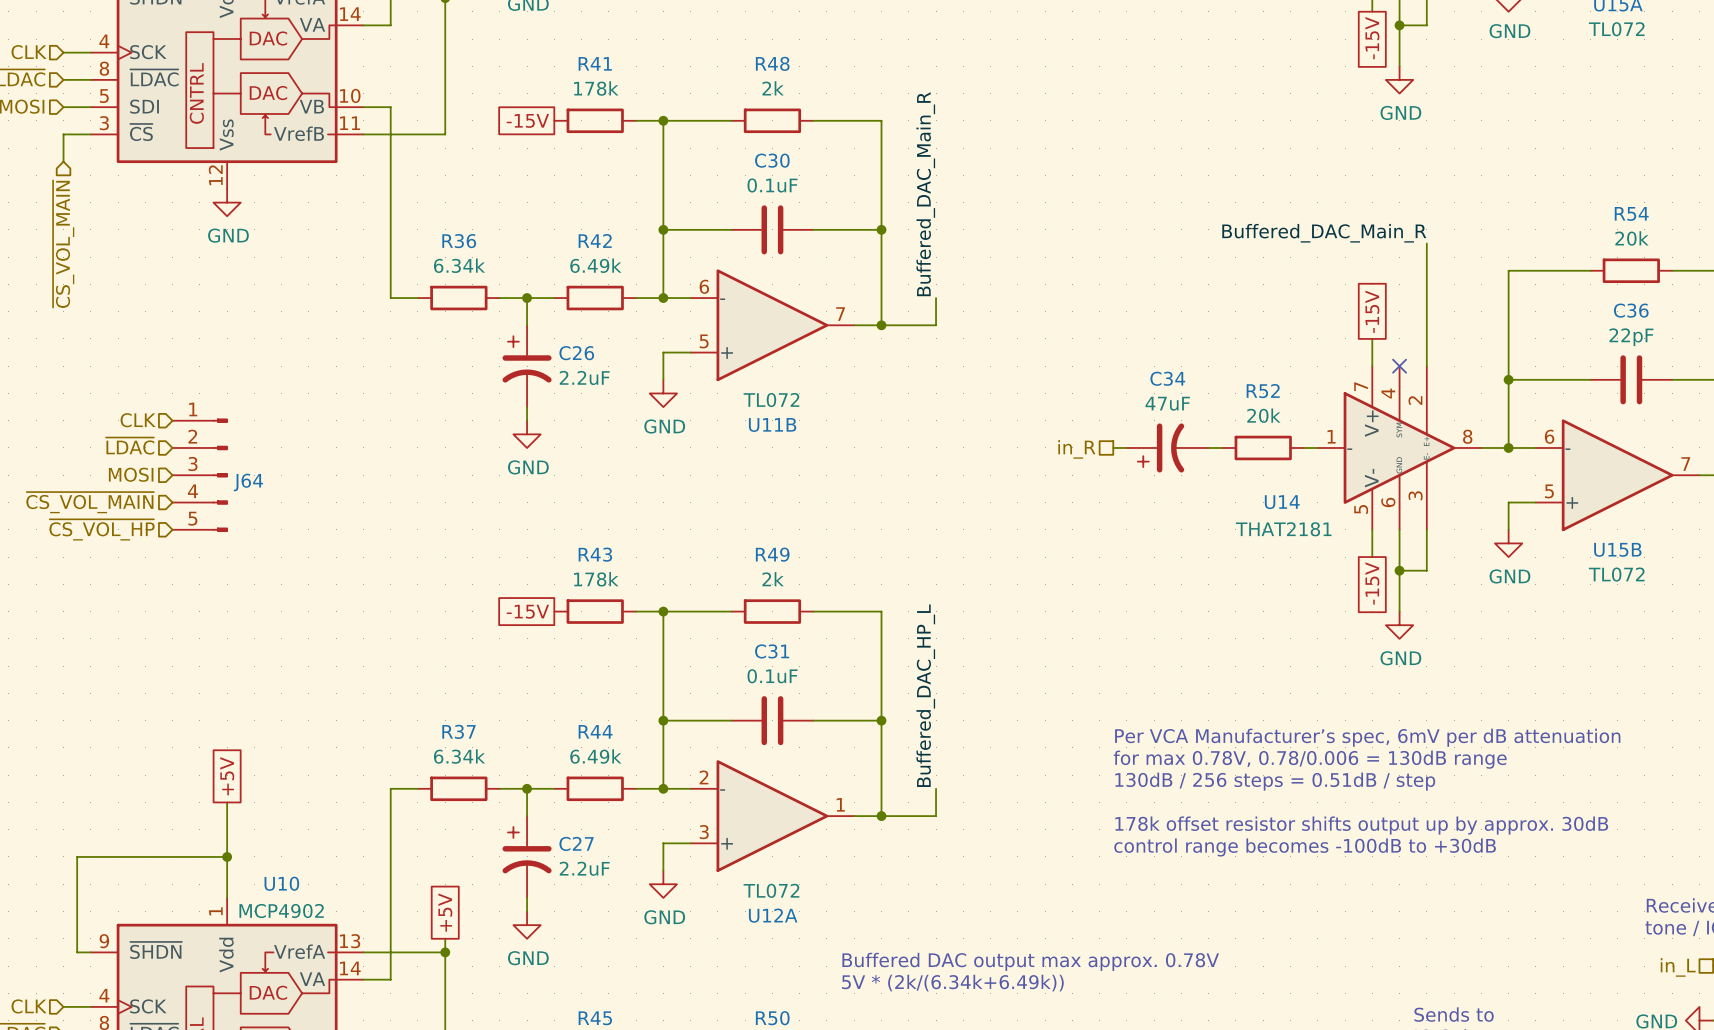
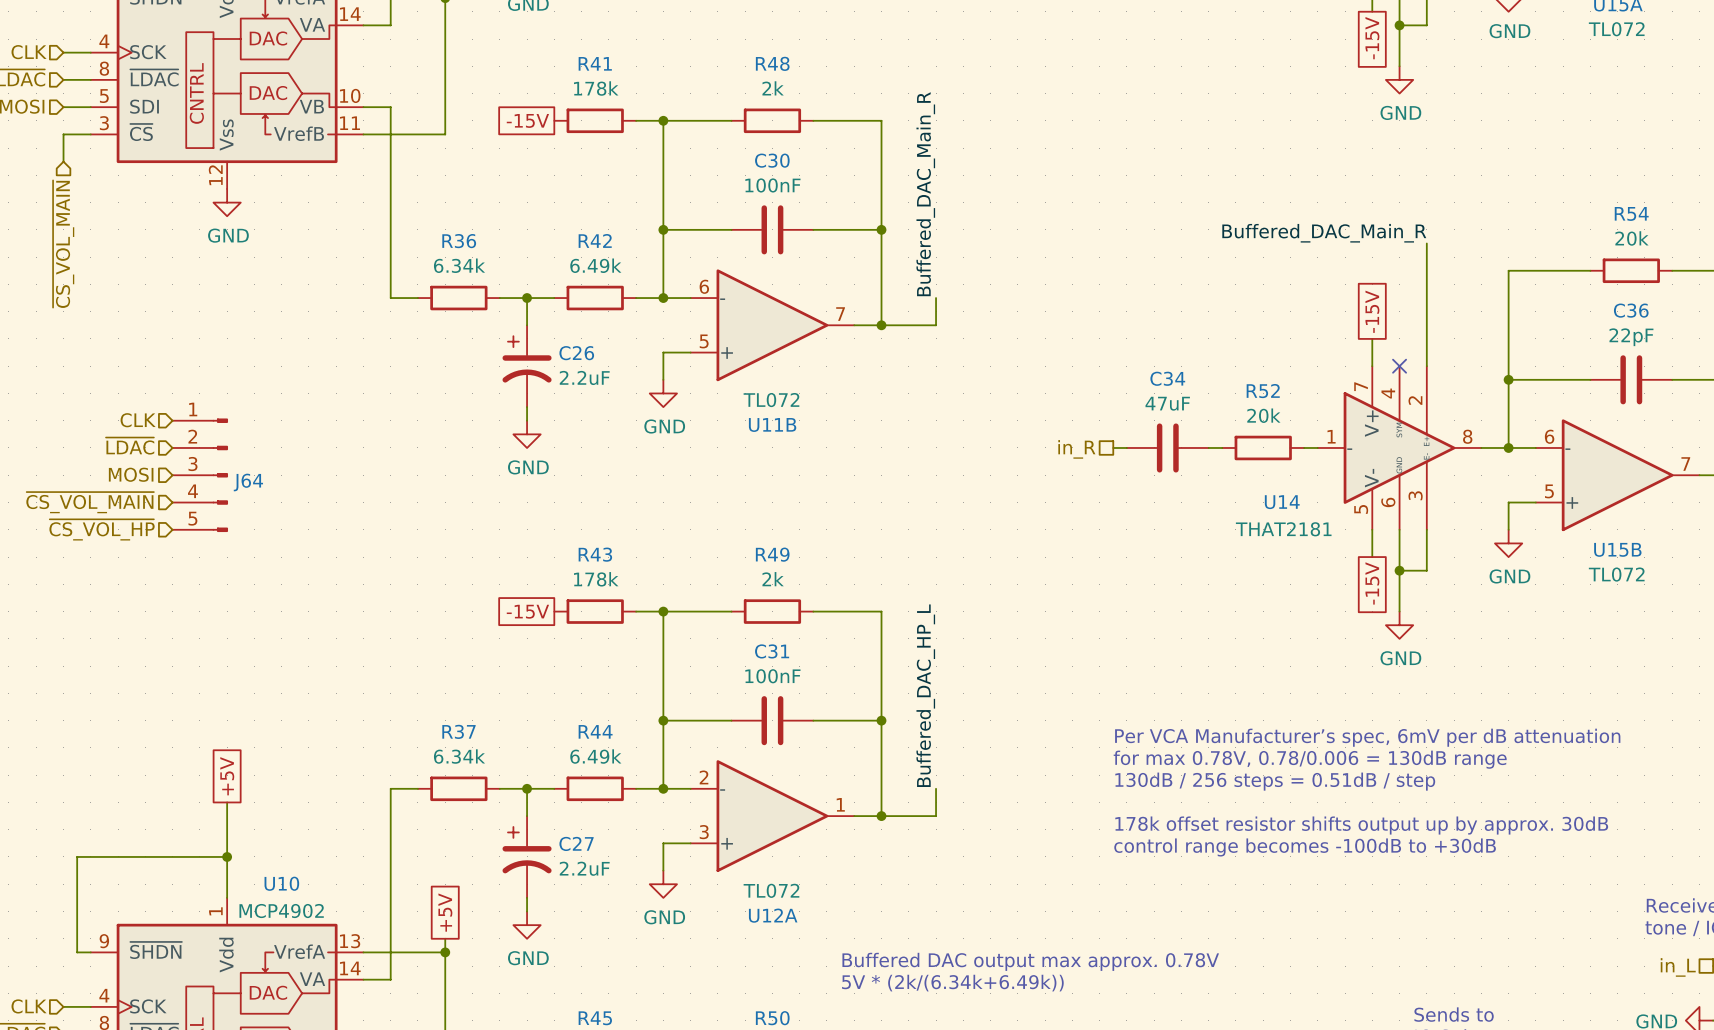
C30 value: 0.1uF (772, 185) -> 100nF (772, 185)
C34 symbol: [1126, 423, 1209, 473] -> [1126, 423, 1209, 473]
C31 value: 0.1uF (772, 676) -> 100nF (772, 676)

